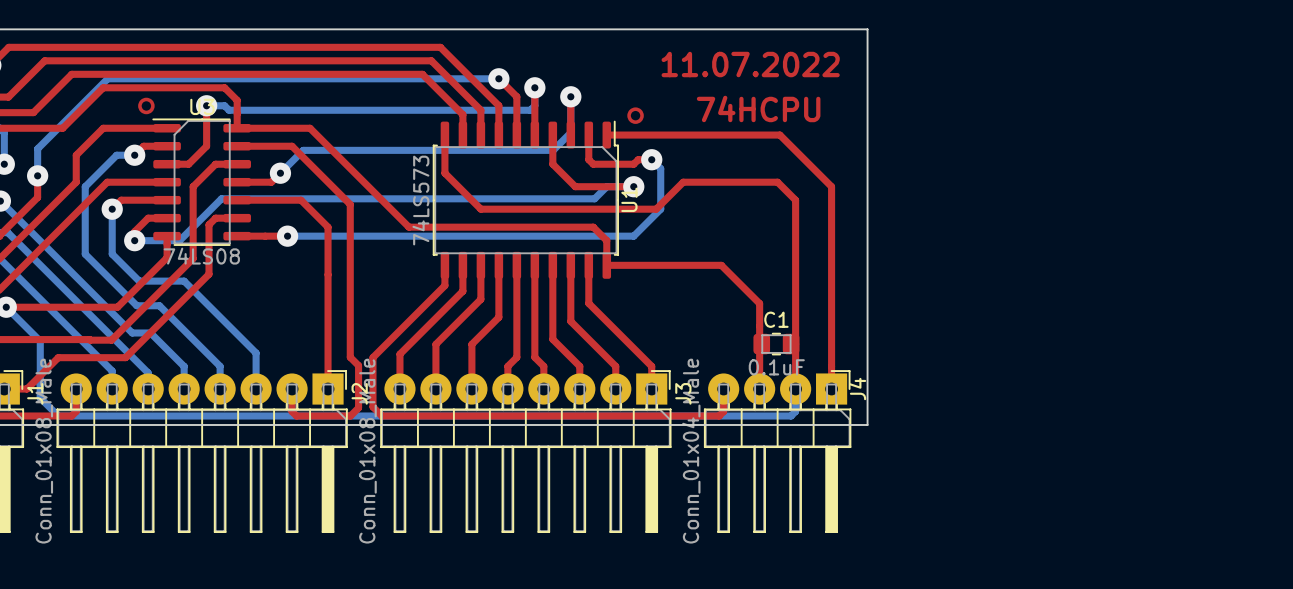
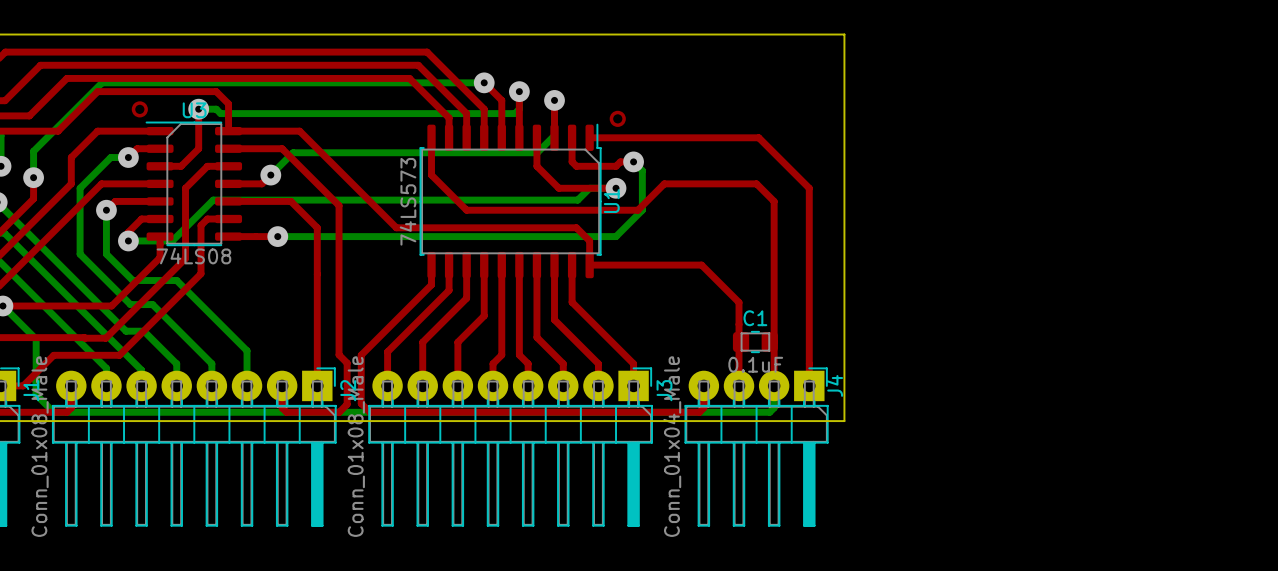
text: 11.07.2022 (750, 64) -> none
text: 74HCPU (758, 108) -> none

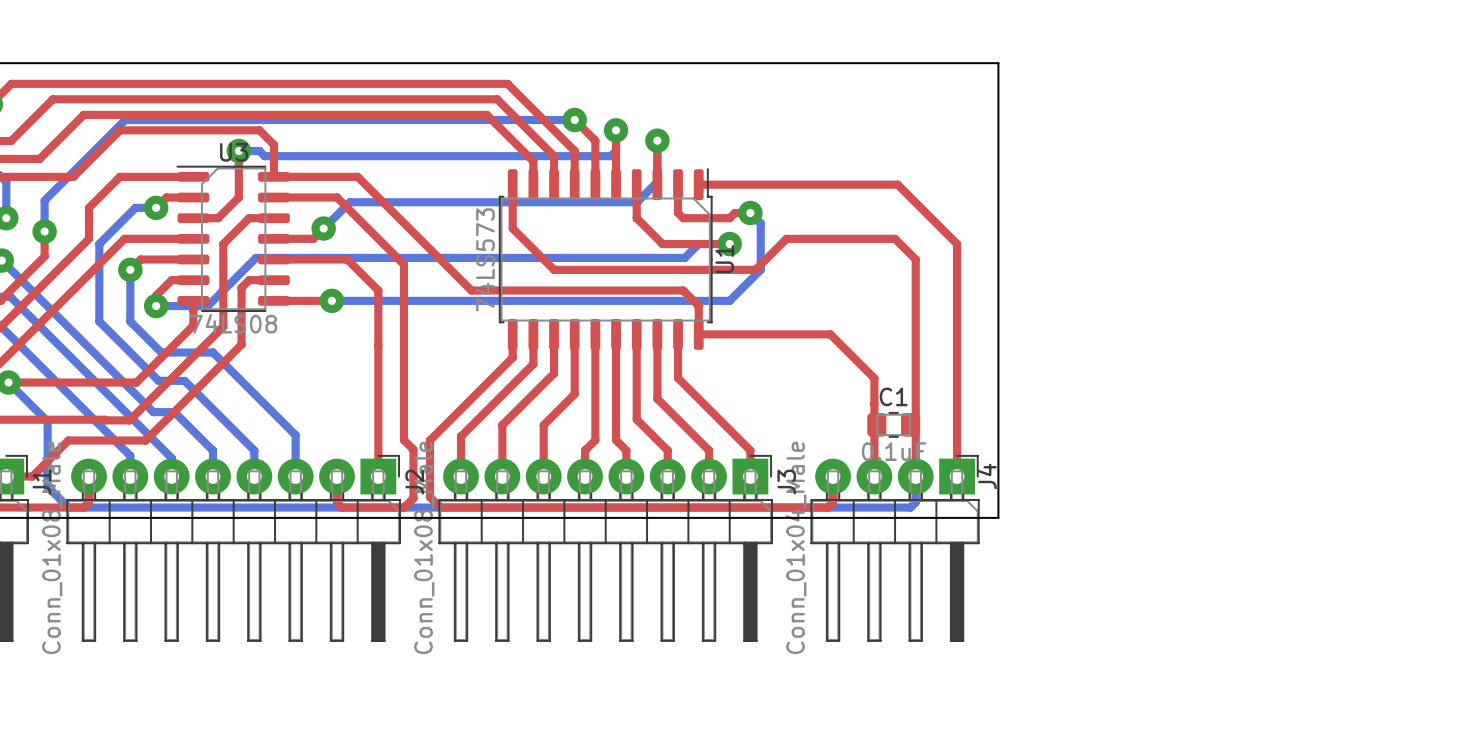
drawing: [131, 101, 148, 118] -> none
drawing: [609, 110, 626, 127] -> none

